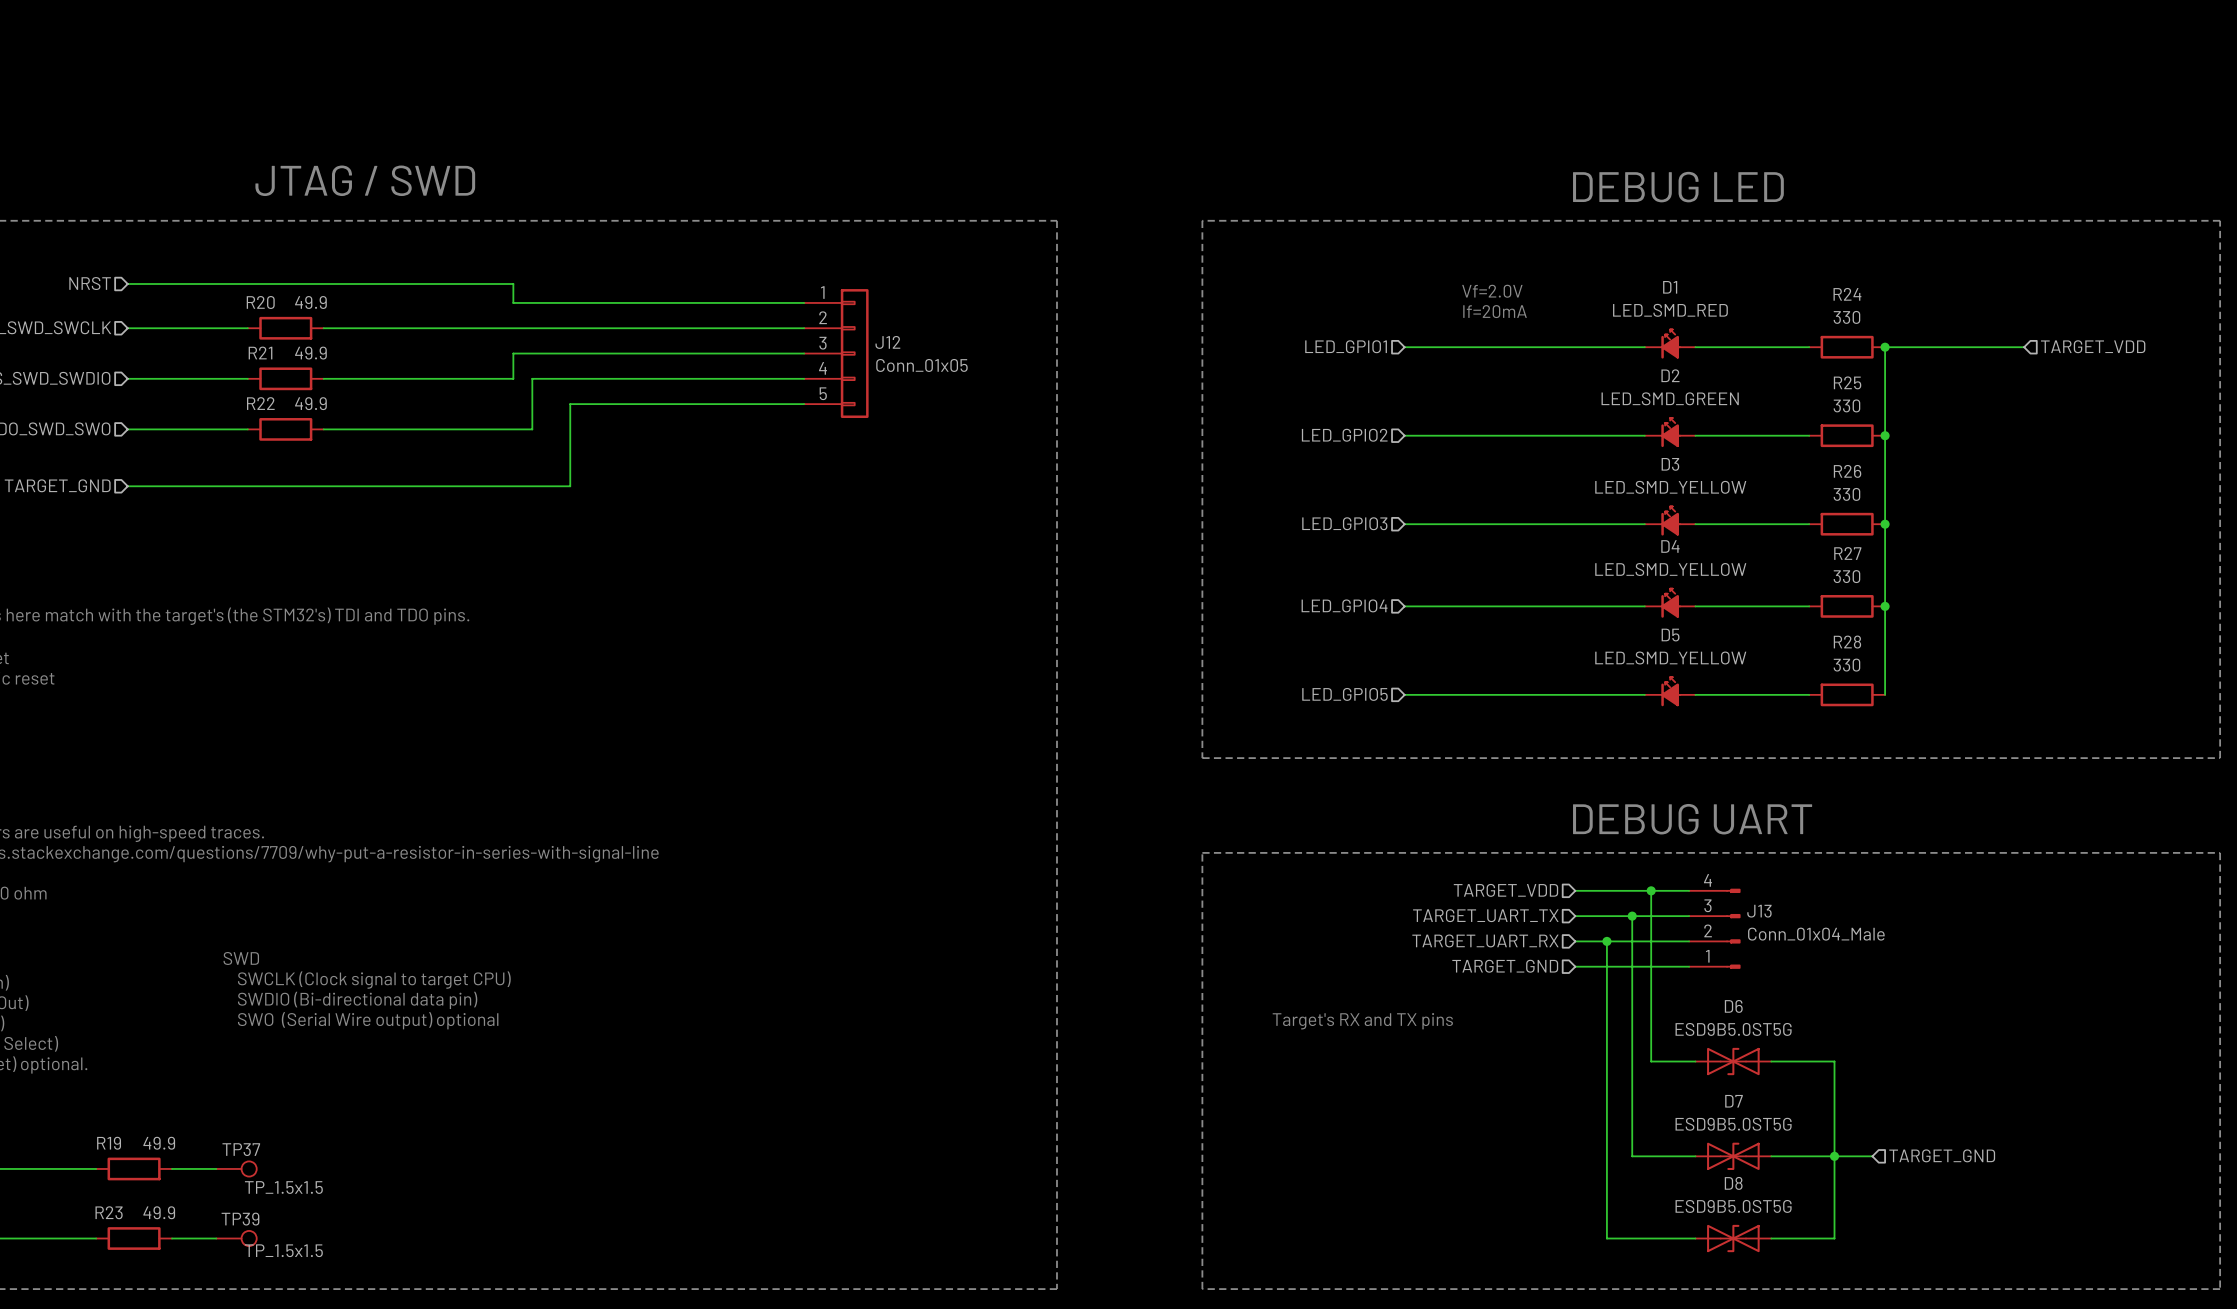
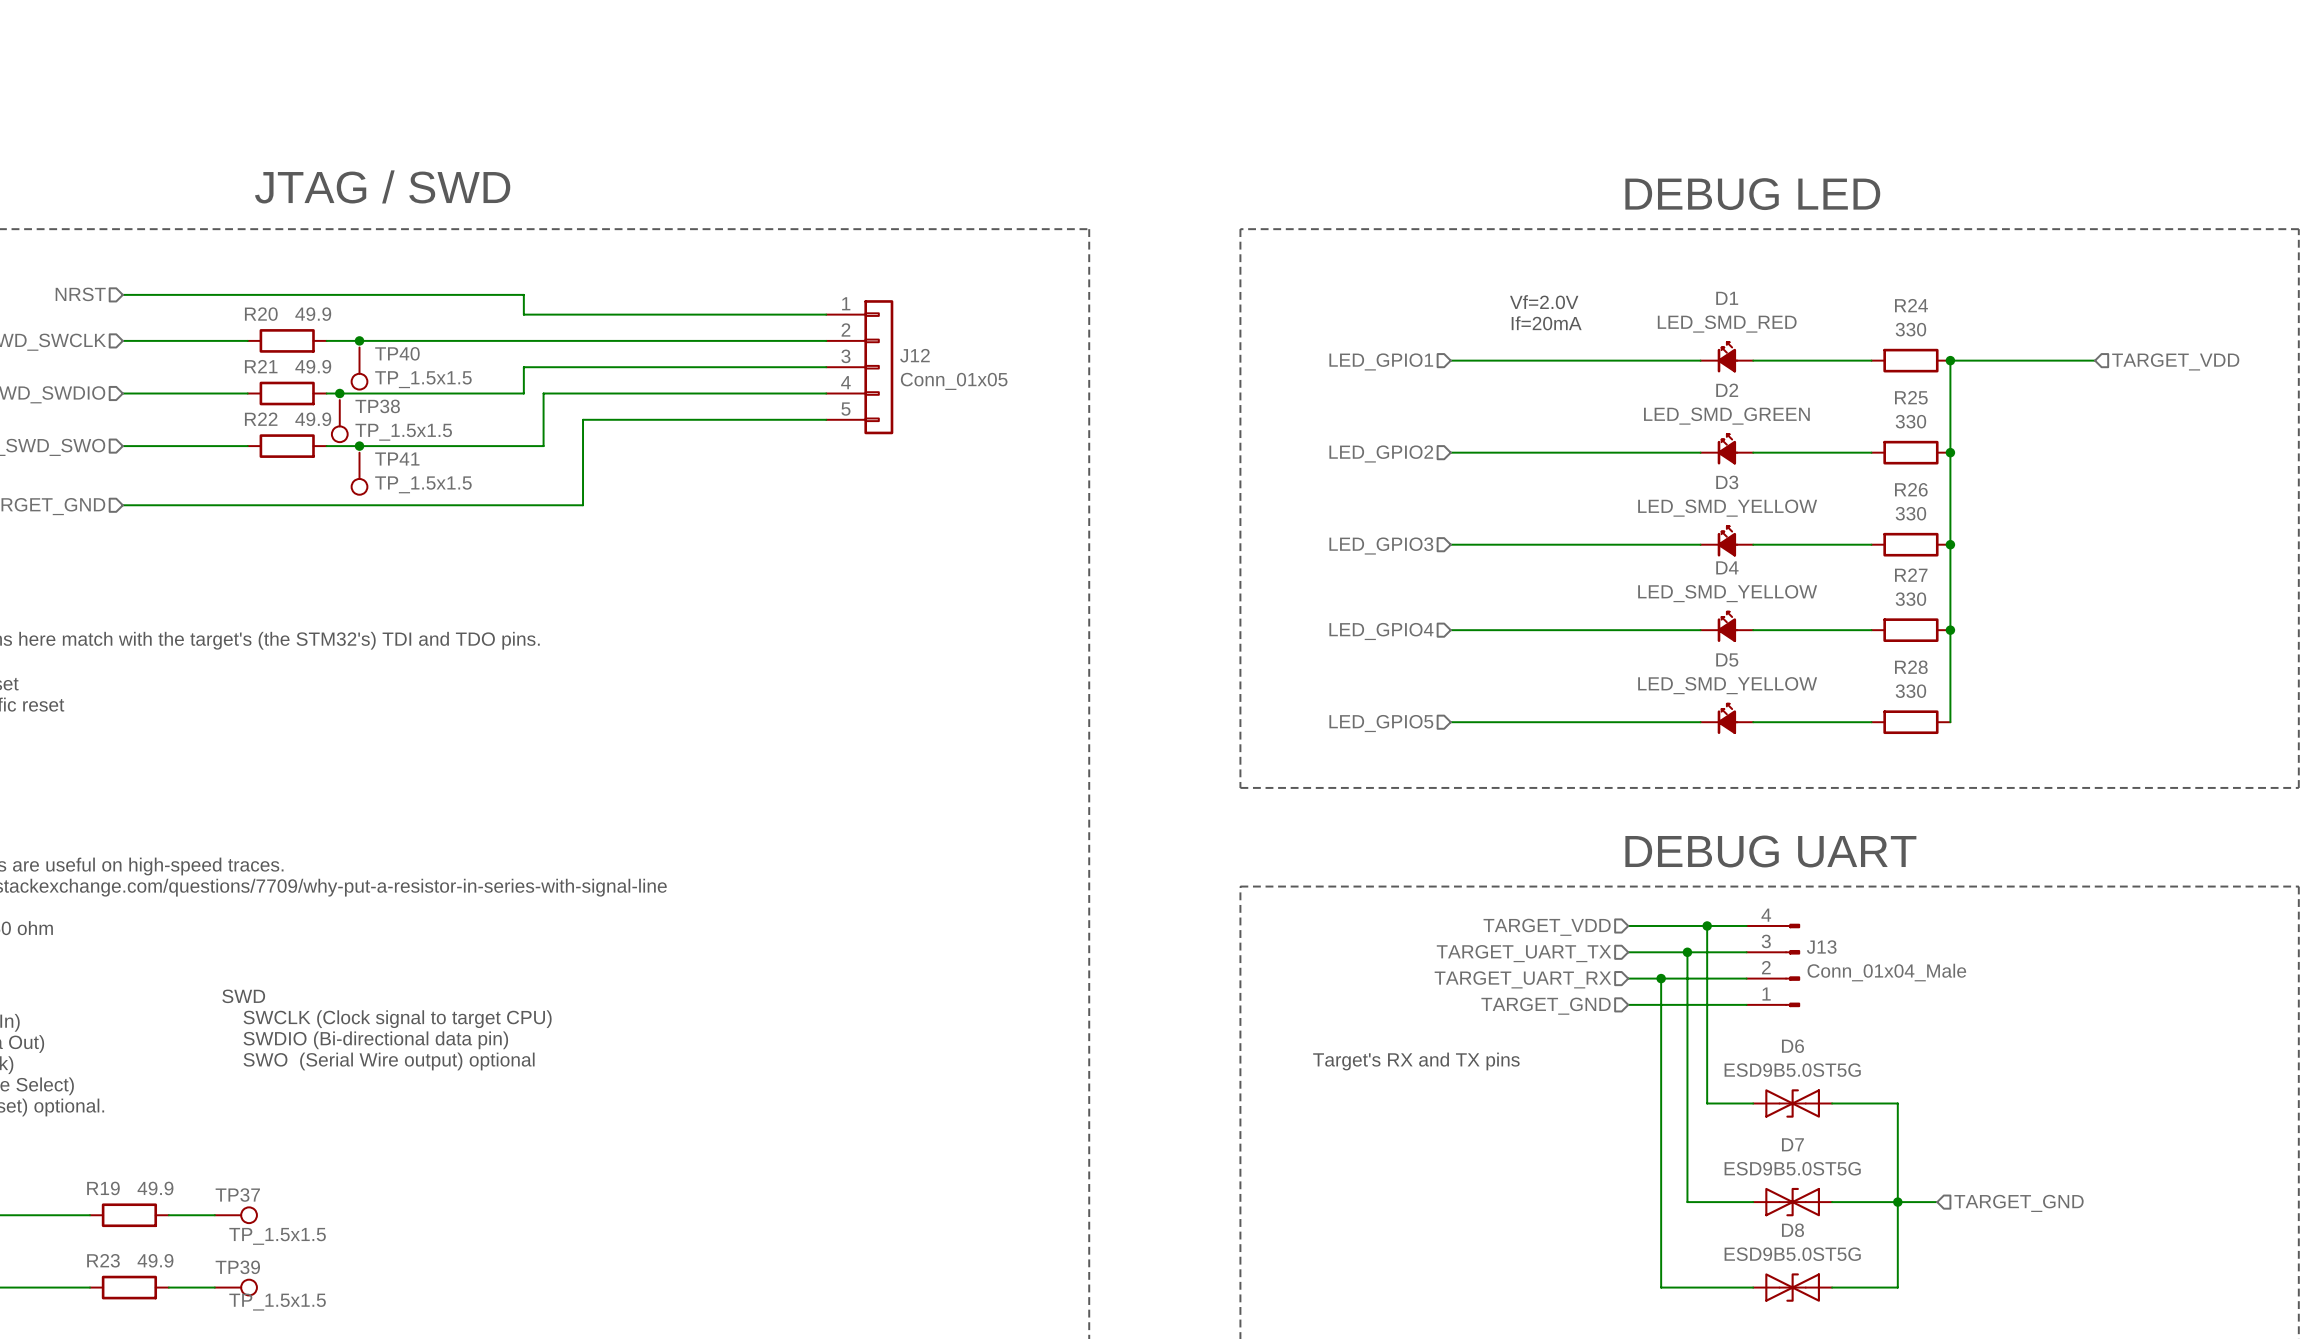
junction: none -> (359, 340)
TP40: none -> TP_1.5x1.5 (359, 368)
junction: none -> (339, 393)
TP38: none -> TP_1.5x1.5 (339, 421)
junction: none -> (359, 446)
TP41: none -> TP_1.5x1.5 (359, 473)

